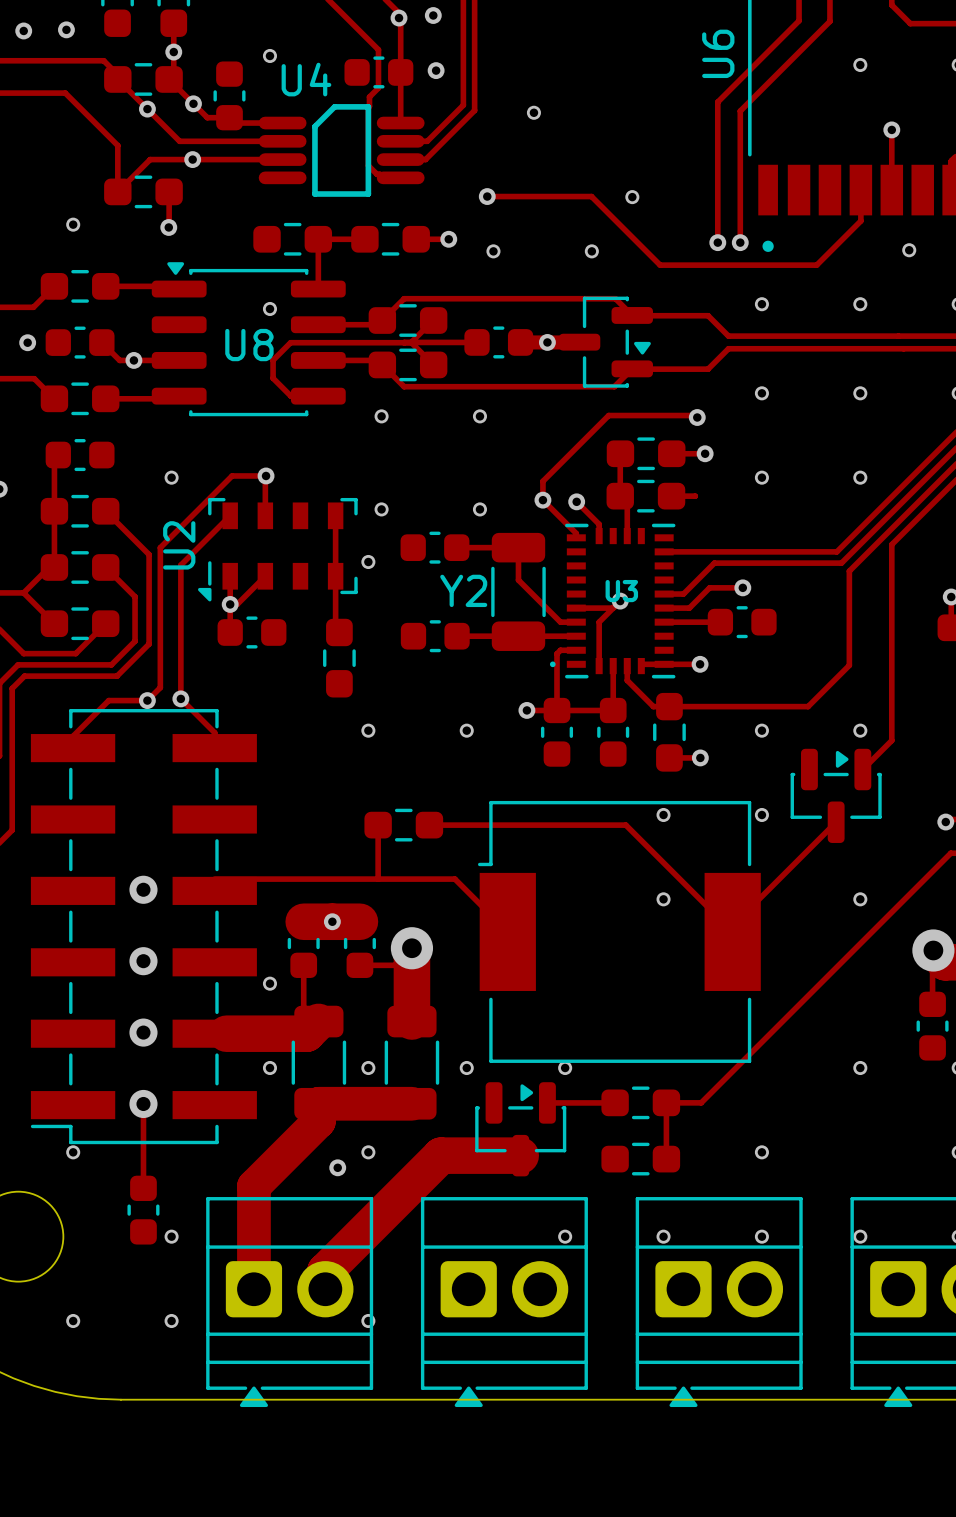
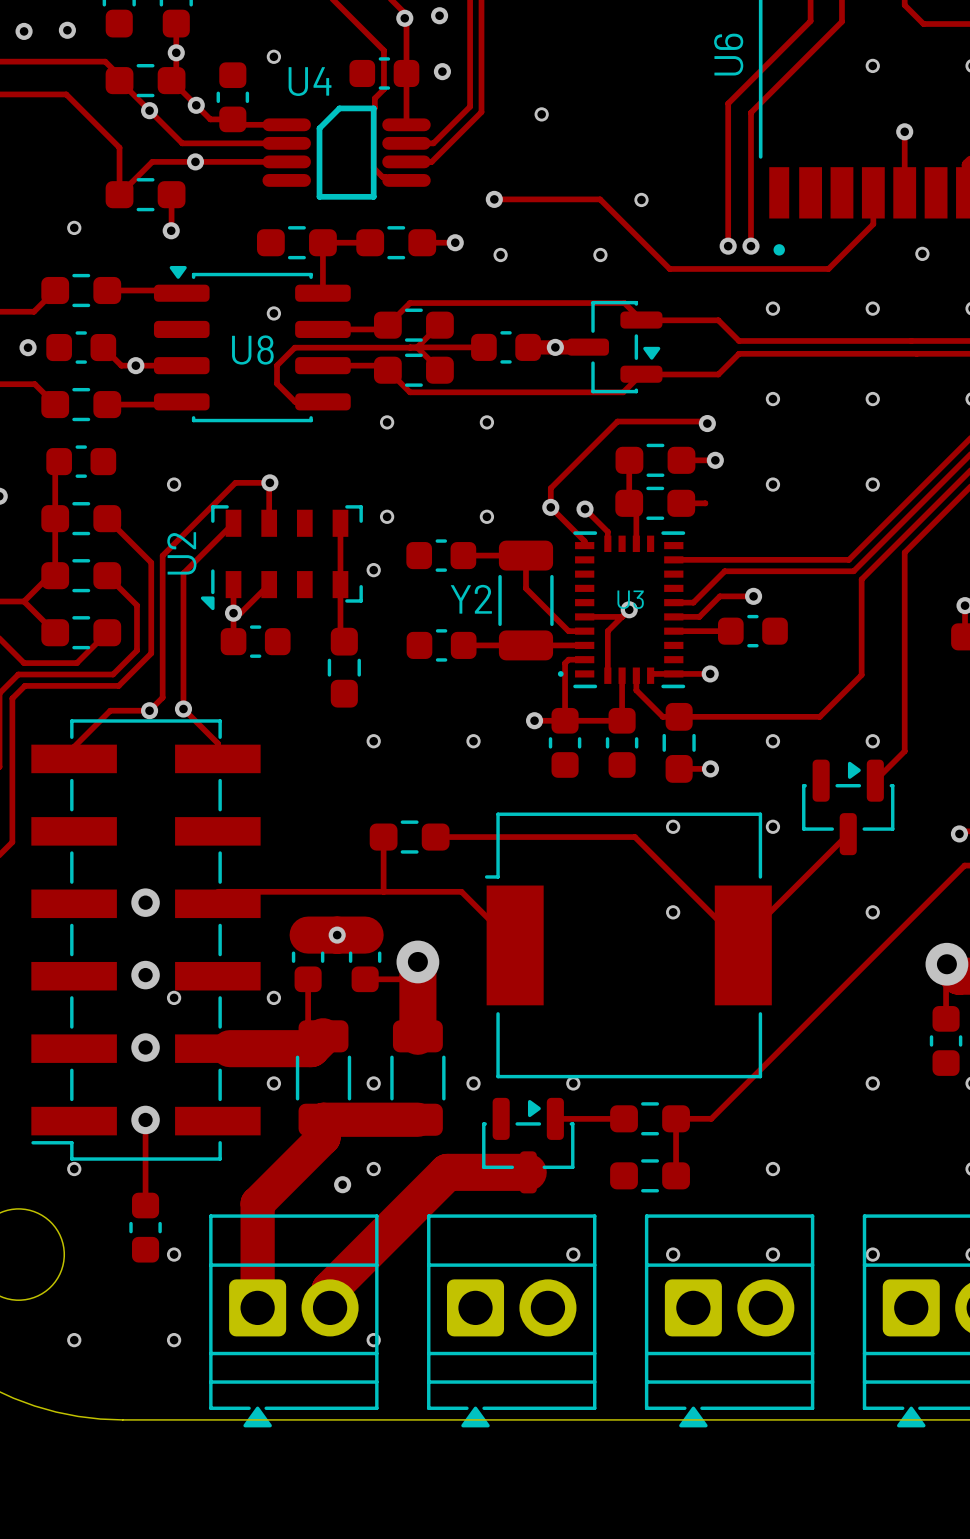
via: none -> (174, 997)

